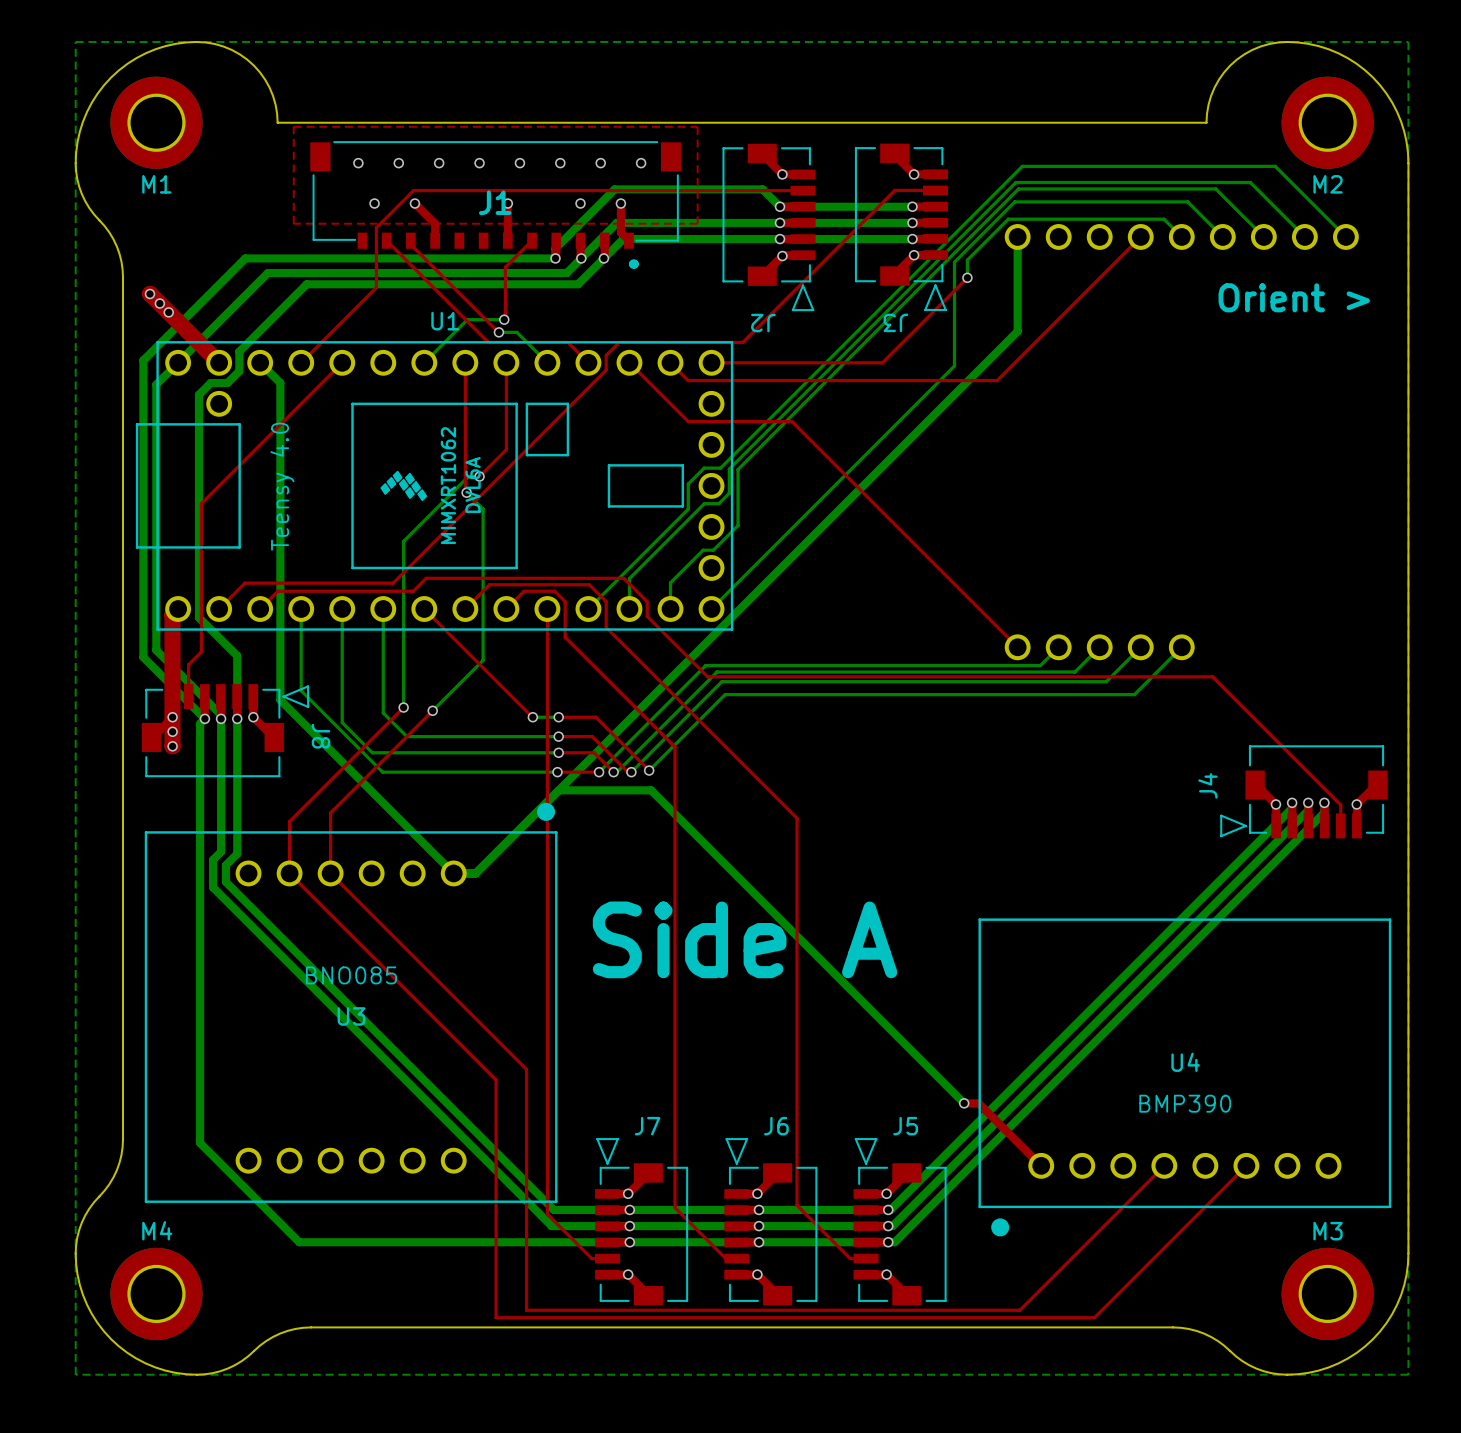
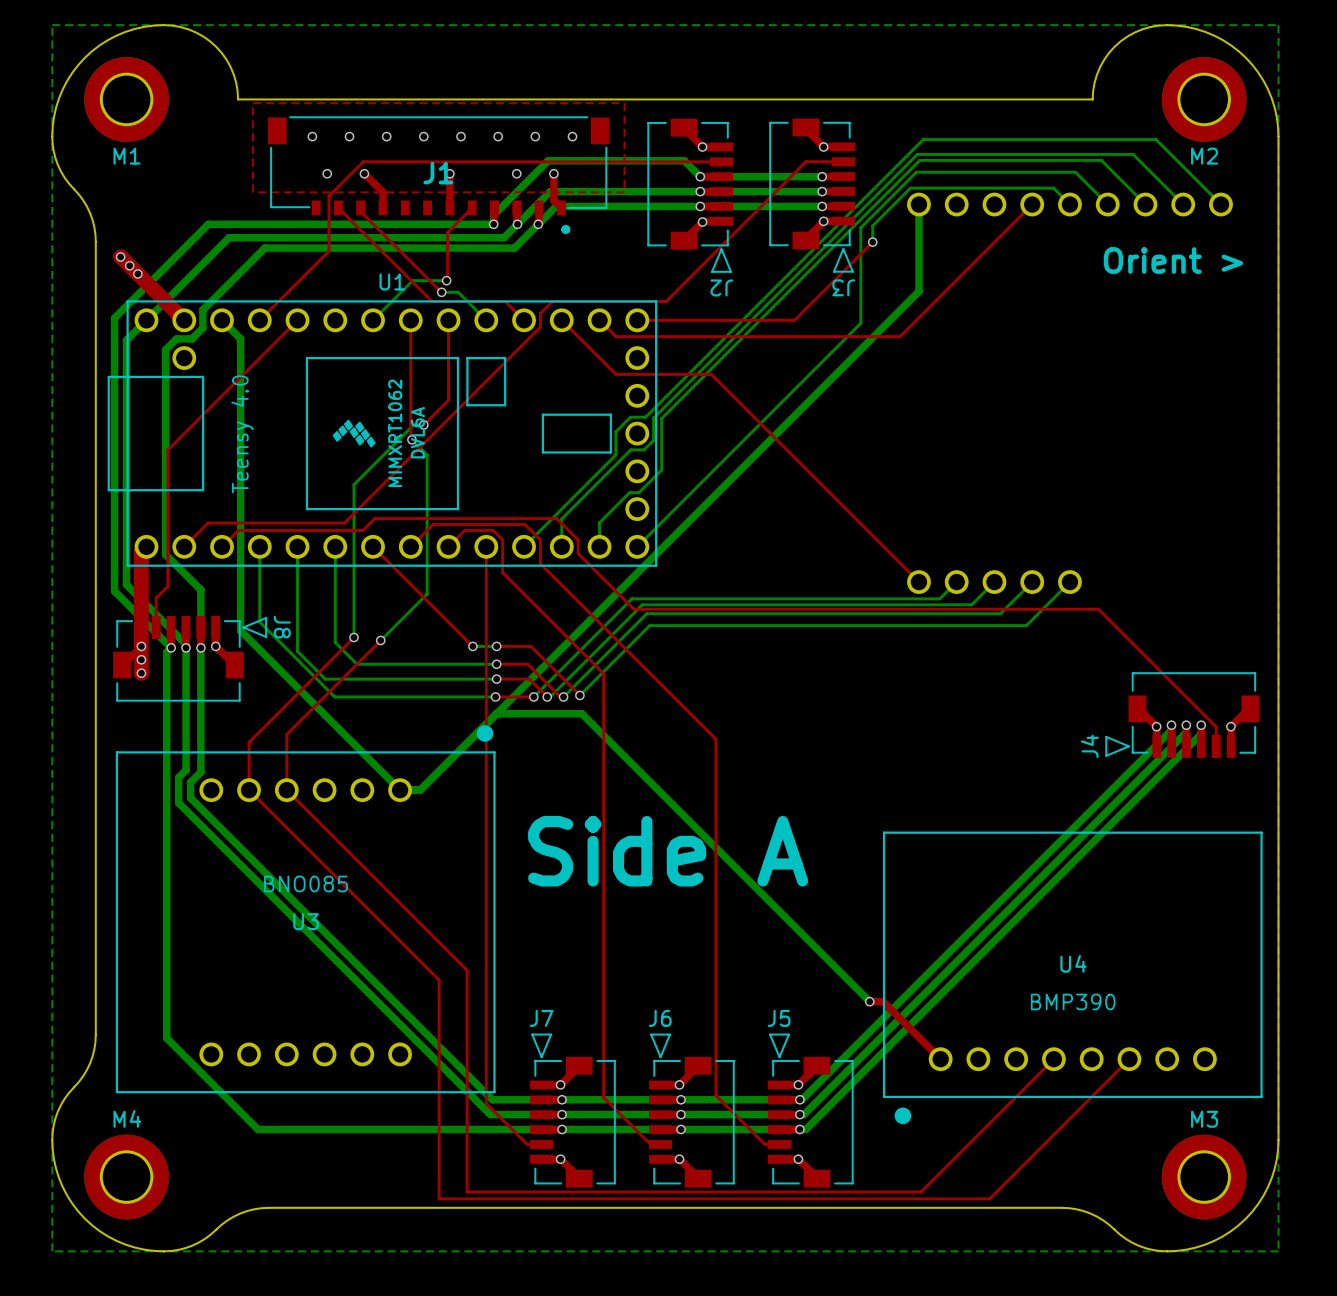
J3 name position: J3 (895, 322) -> J3 (843, 287)
J2 name position: J2 (763, 323) -> J2 (721, 287)
J8 name position: J8 (321, 736) -> J8 (282, 627)
J4 name position: J4 (1207, 785) -> J4 (1089, 746)
J7 name position: J7 (647, 1126) -> J7 (541, 1018)
J6 name position: J6 (776, 1126) -> J6 (660, 1018)
J5 name position: J5 (905, 1126) -> J5 (779, 1018)

